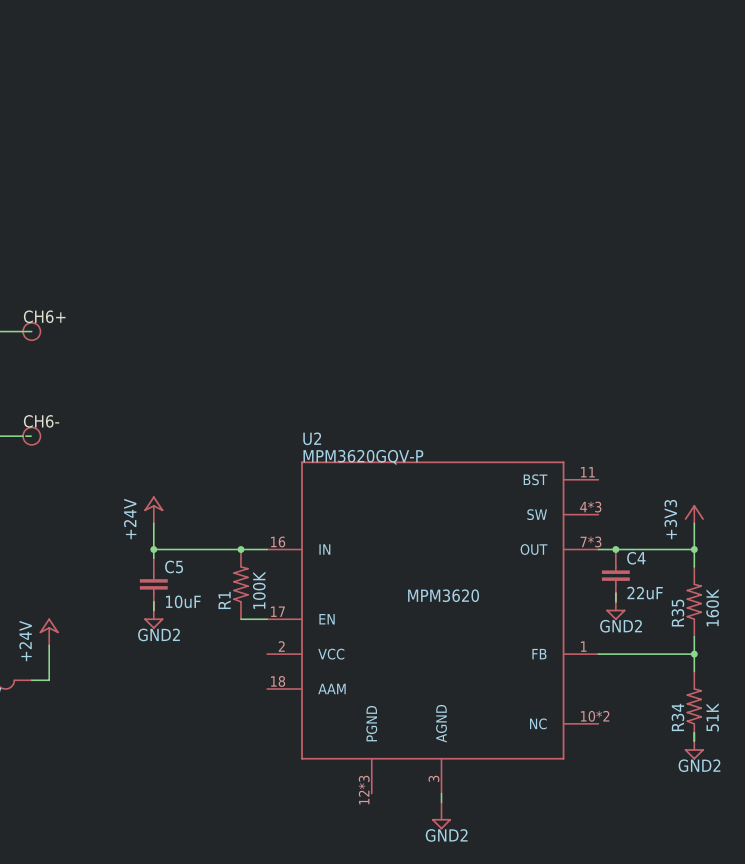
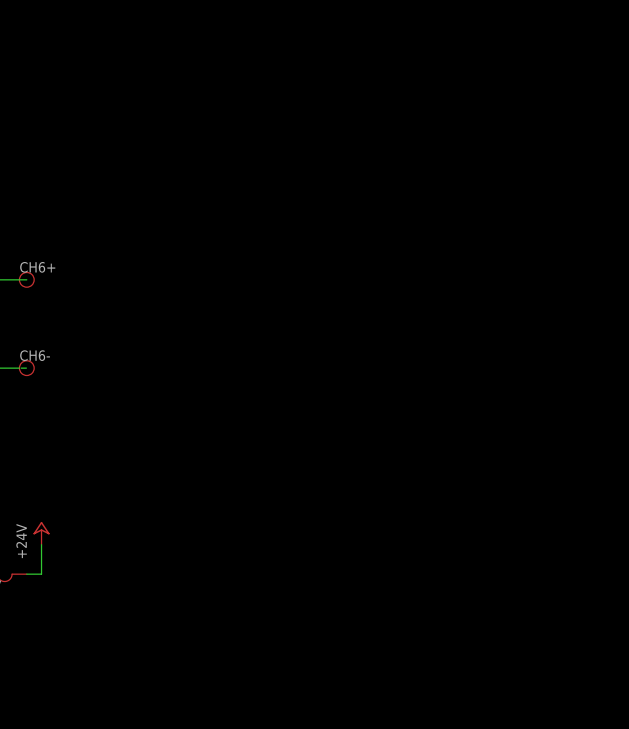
power symbol: +24V (153, 509) -> none
power symbol: +3V3 (694, 514) -> none
wire: (153, 523) (153, 558) -> none
wire: (694, 523) (694, 566) -> none
wire: (153, 549) (267, 549) -> none
junction: (153, 549) -> none
junction: (240, 549) -> none
wire: (598, 549) (694, 549) -> none
junction: (615, 549) -> none
junction: (694, 549) -> none
C4: 22uF (615, 575) -> none
C5: 10uF (153, 584) -> none
R1: 100K (240, 584) -> none
wire: (615, 593) (615, 601) -> none
wire: (153, 601) (153, 610) -> none
R35: 160K (694, 601) -> none
power symbol: GND2 (615, 606) -> none
power symbol: GND2 (153, 615) -> none
wire: (240, 619) (267, 619) -> none
U2: MPM3620GQV-P (432, 627) -> none
wire: (694, 636) (694, 671) -> none
wire: (598, 654) (694, 654) -> none
junction: (694, 654) -> none
R34: 51K (694, 706) -> none
wire: (694, 732) (694, 741) -> none
power symbol: GND2 (694, 746) -> none
wire: (441, 793) (441, 802) -> none
power symbol: GND2 (441, 815) -> none

